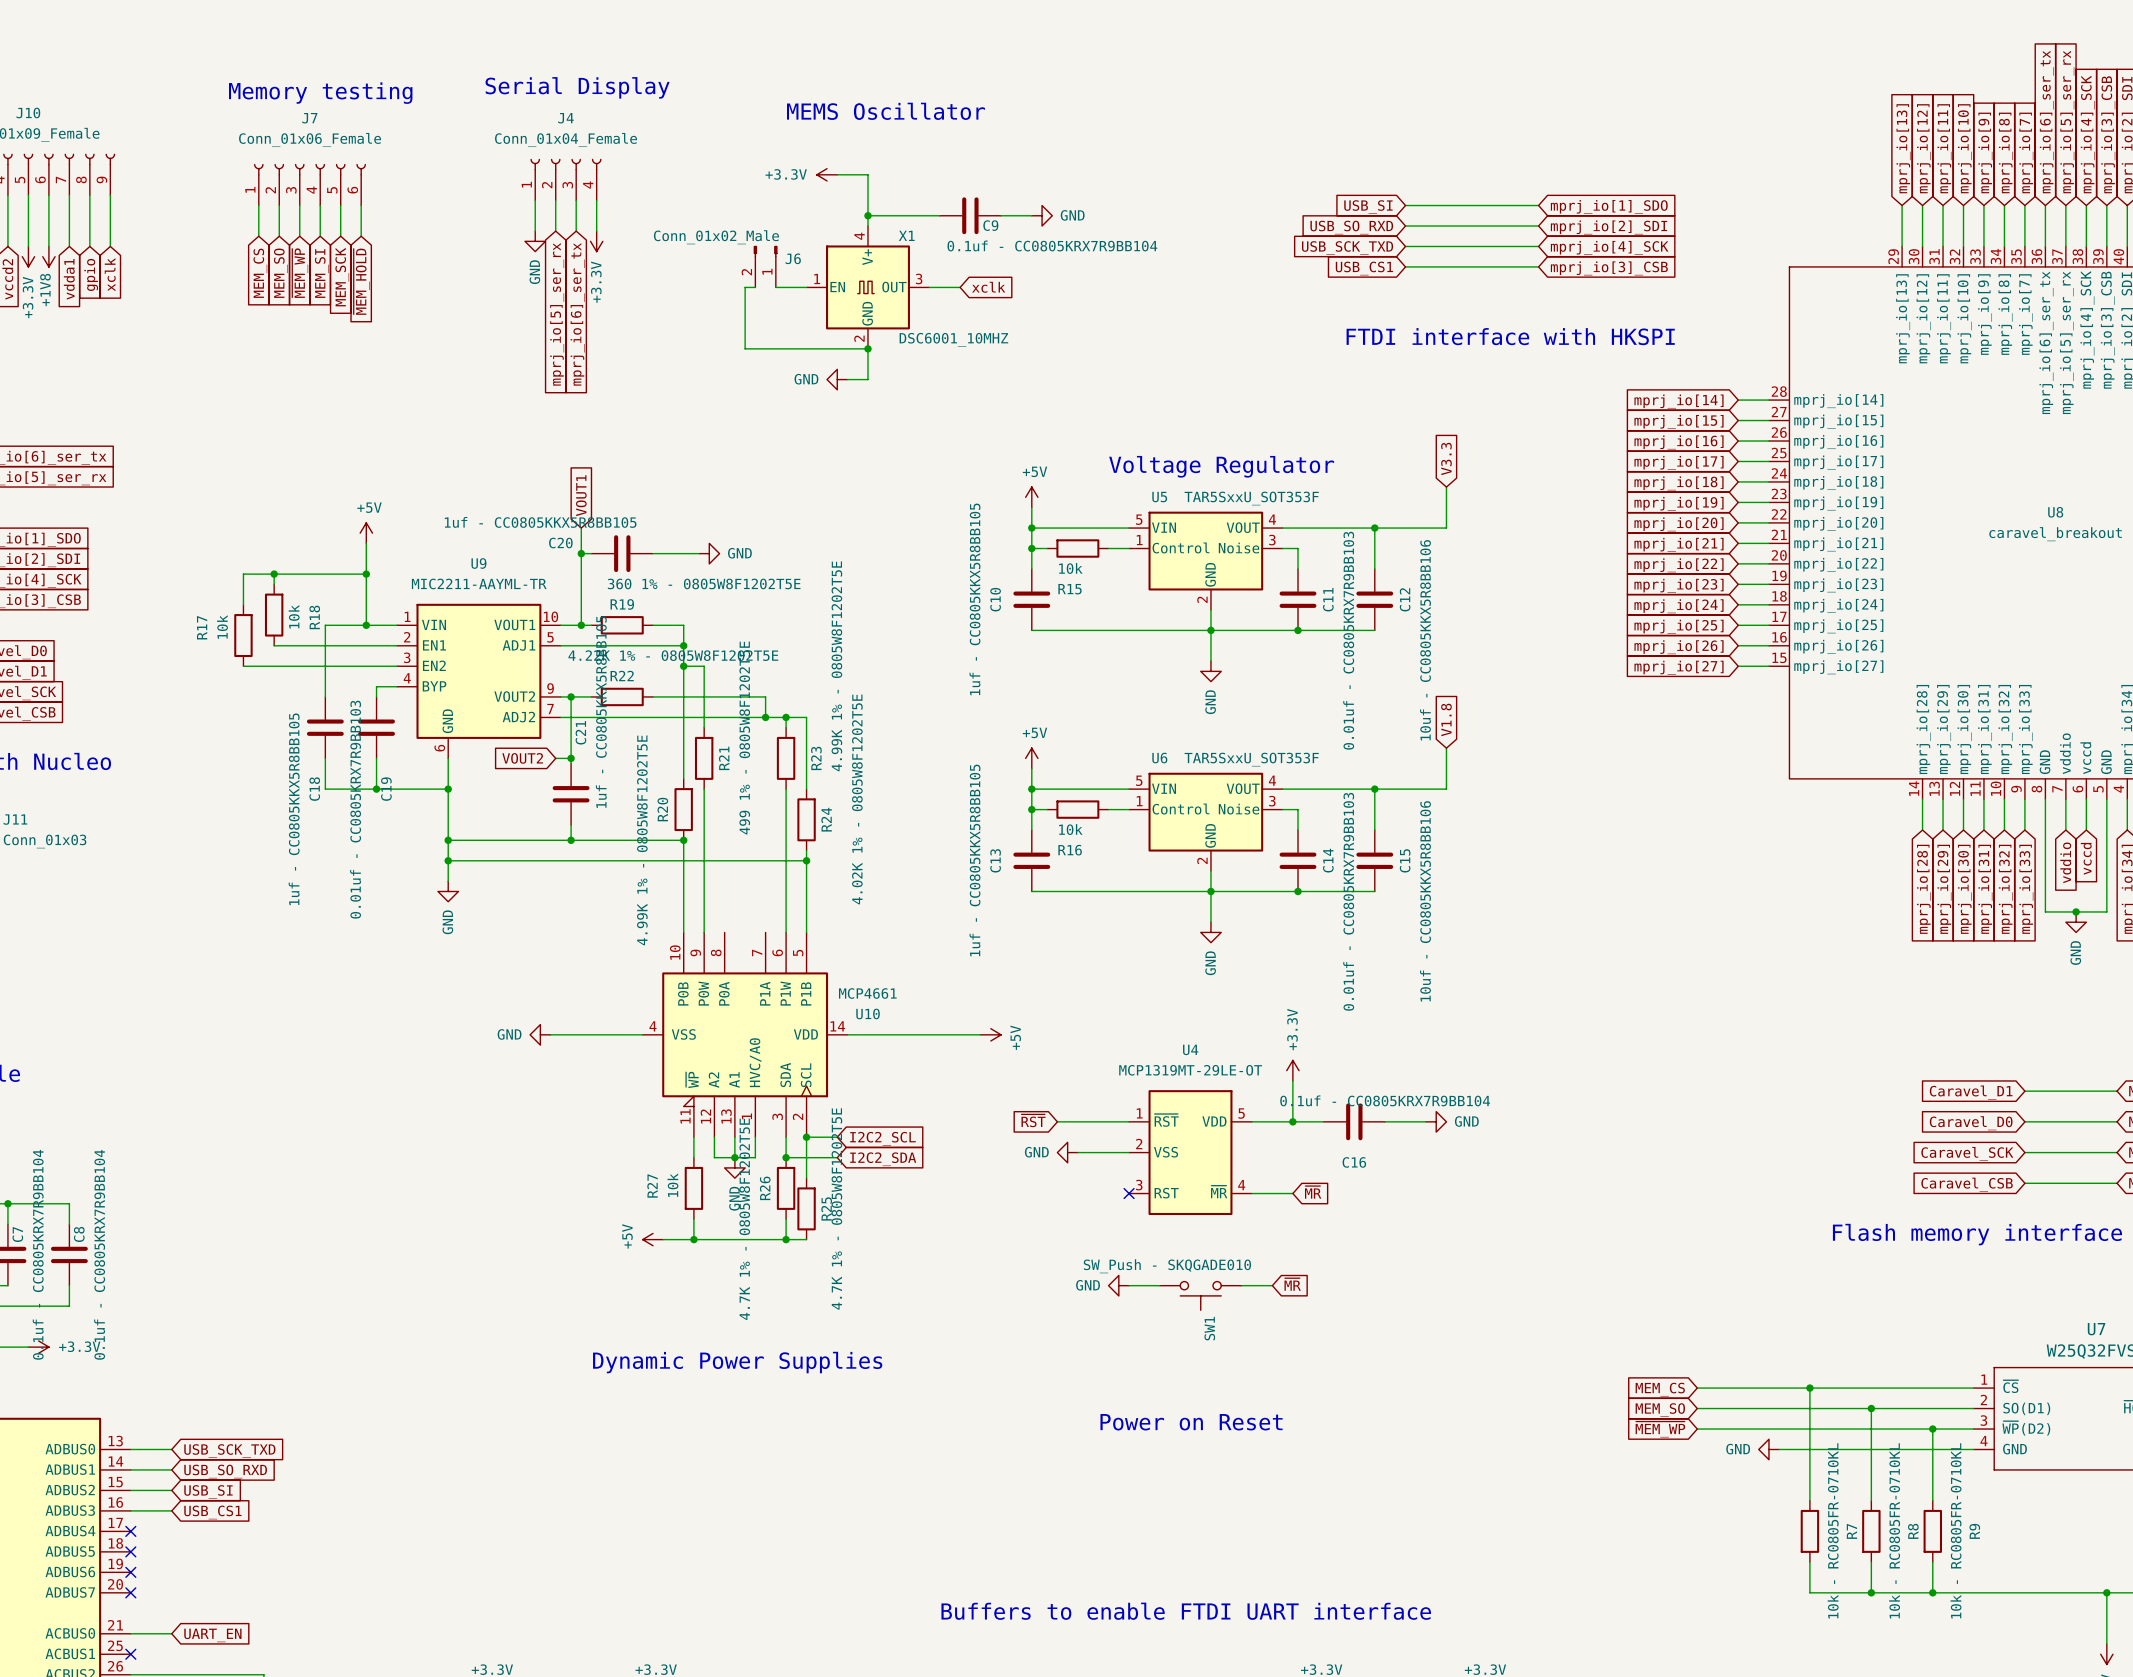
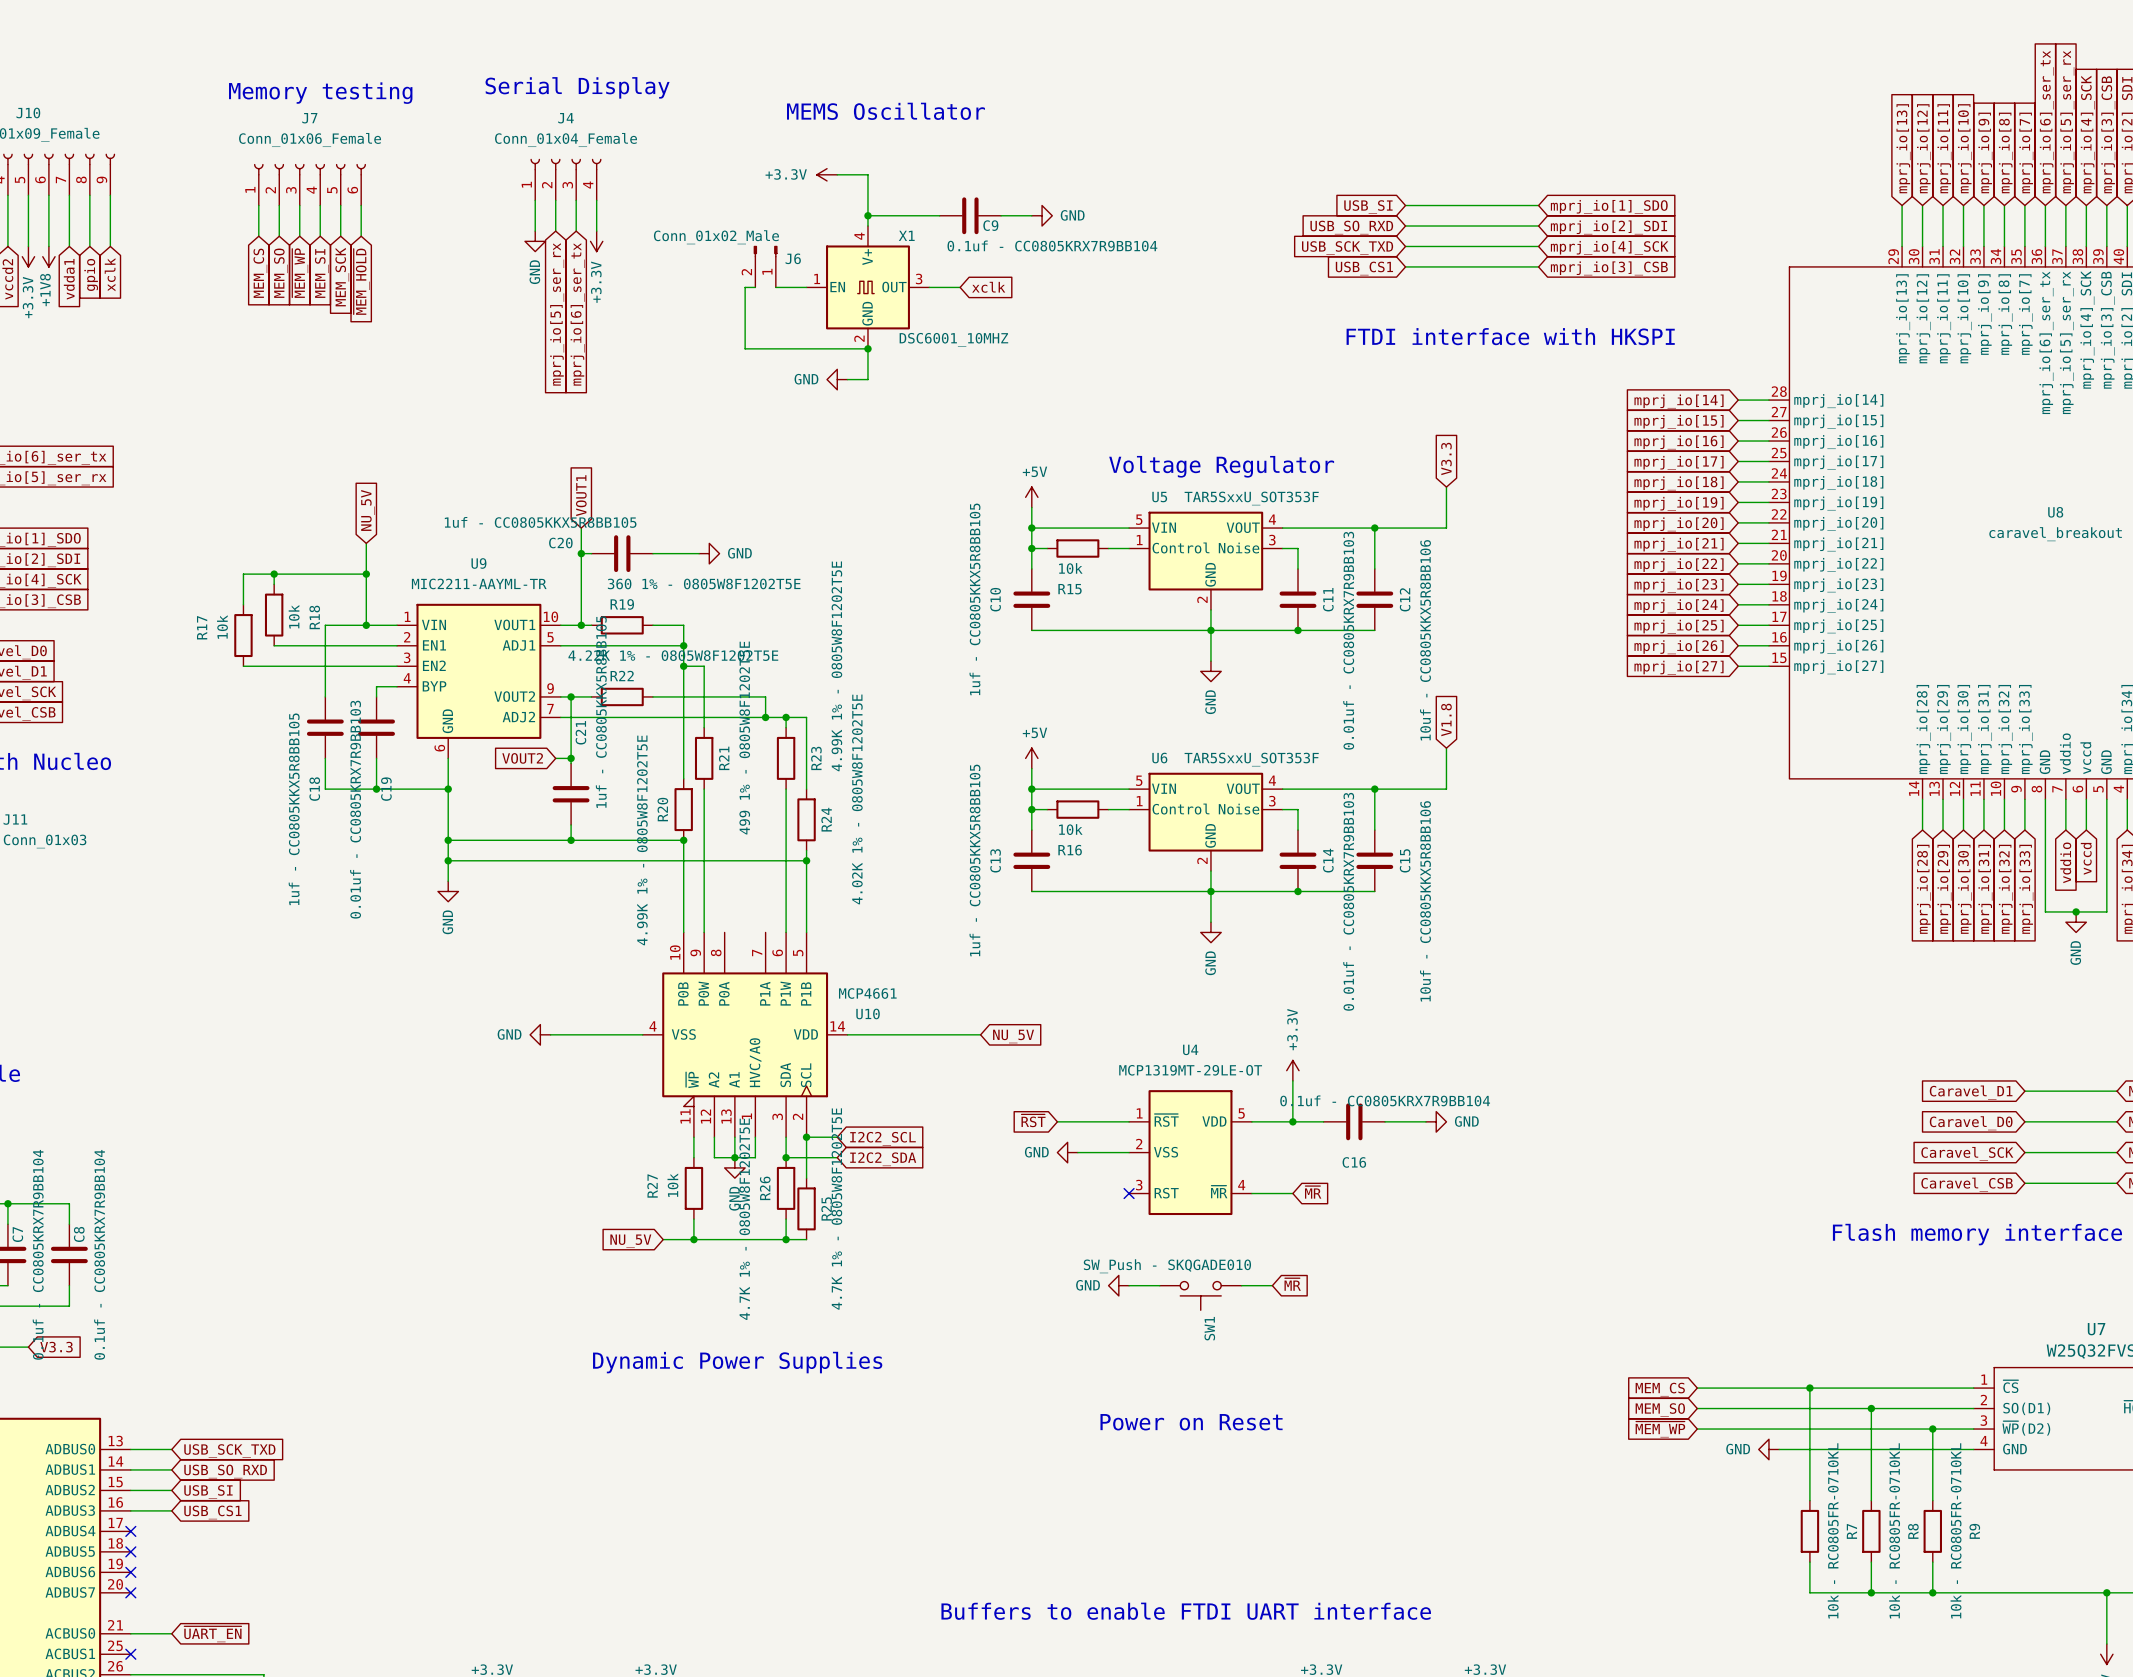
global label: none -> NU_5V (367, 510)
power symbol: +5V (366, 533) -> none
power symbol: +5V (990, 1034) -> none
global label: none -> NU_5V (1013, 1036)
power symbol: +5V (652, 1239) -> none
global label: none -> NU_5V (630, 1241)
power symbol: +3.3V (38, 1347) -> none
global label: none -> V3.3 (56, 1347)
global label: UART_EN (212, 1635) -> ~{UART_EN} (212, 1634)

